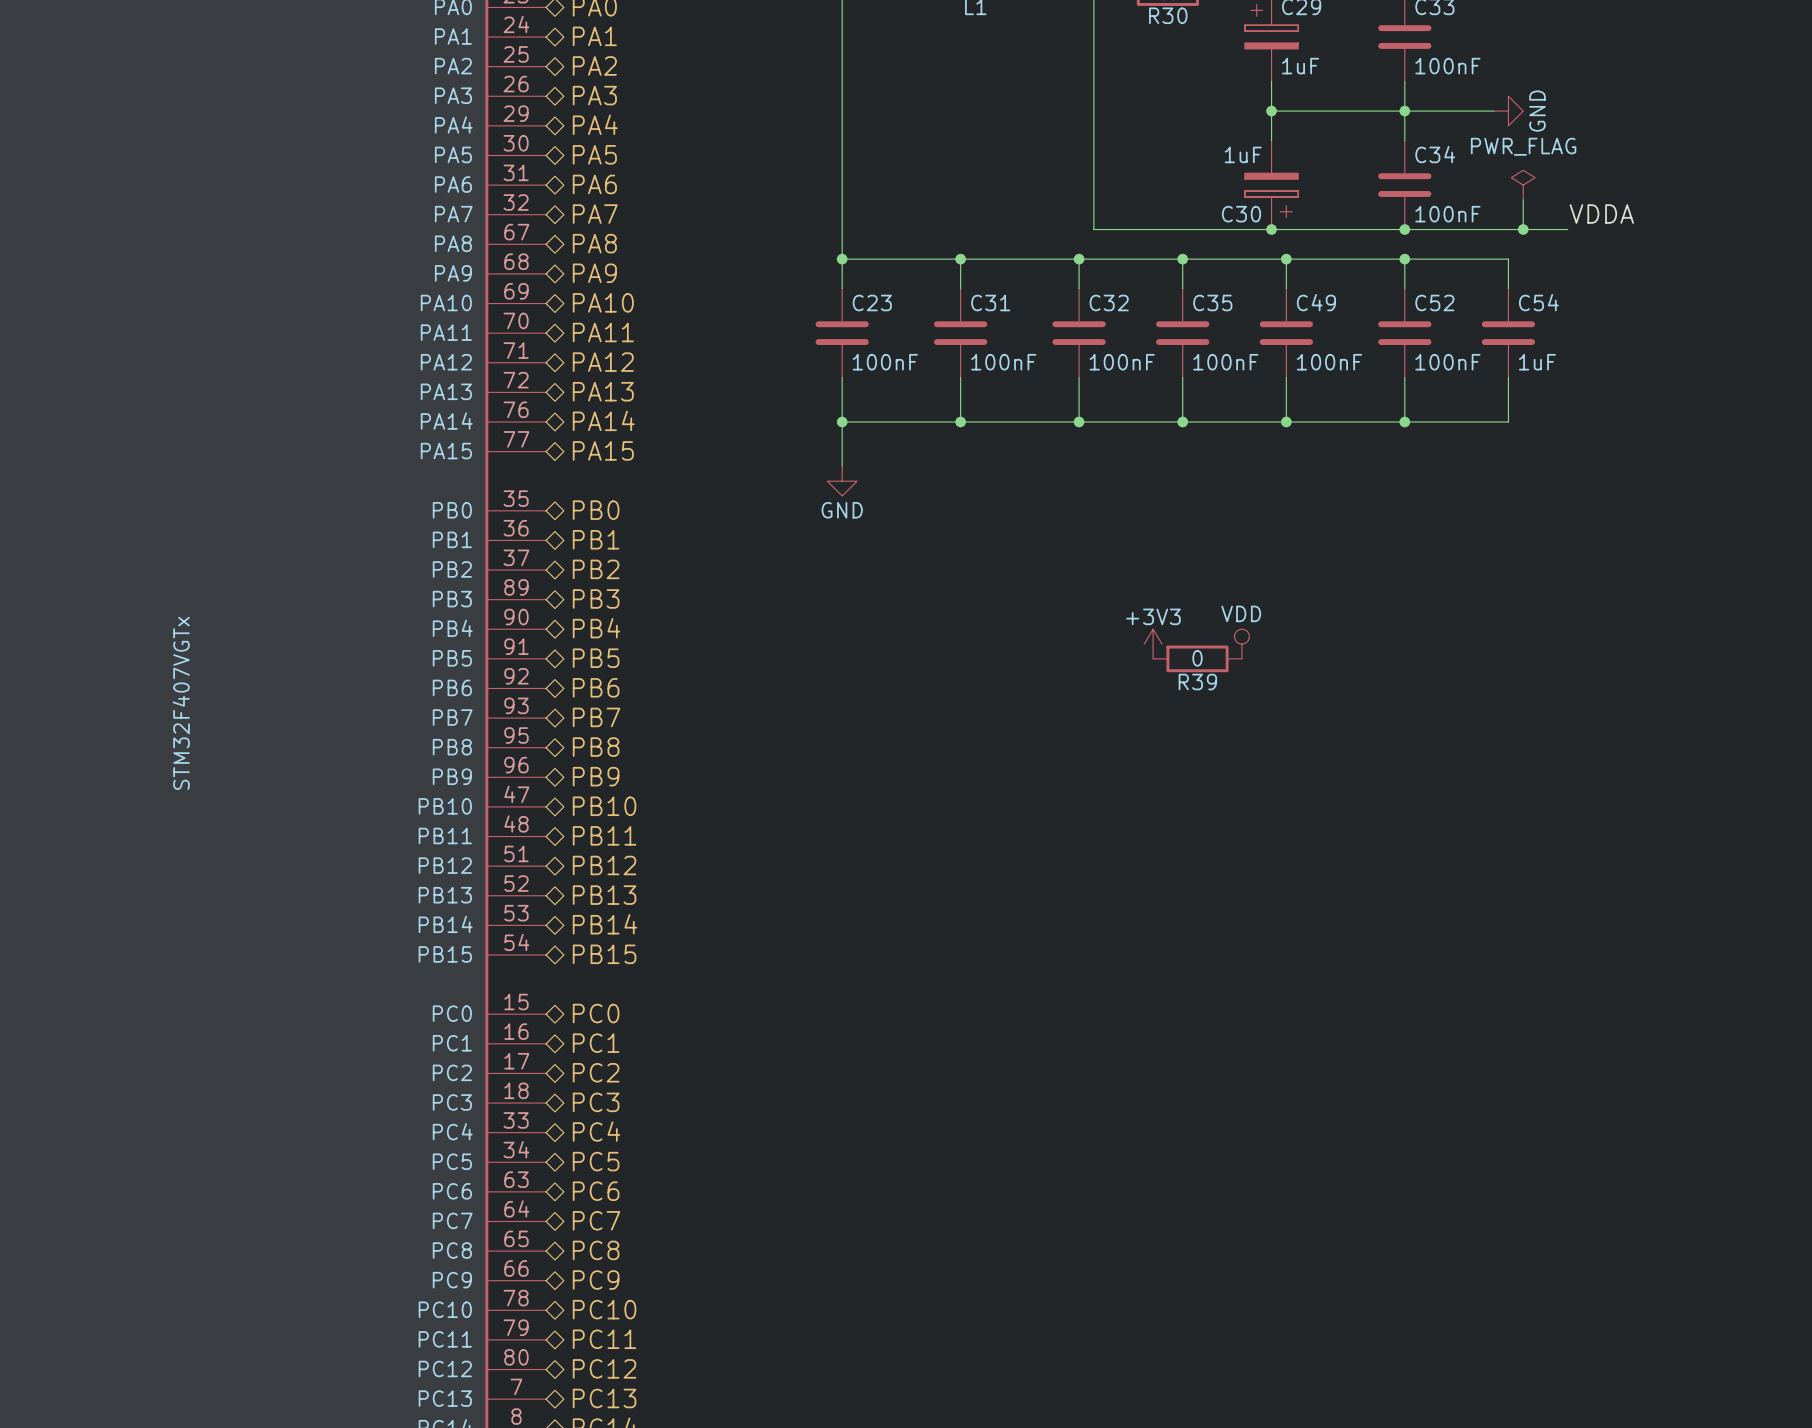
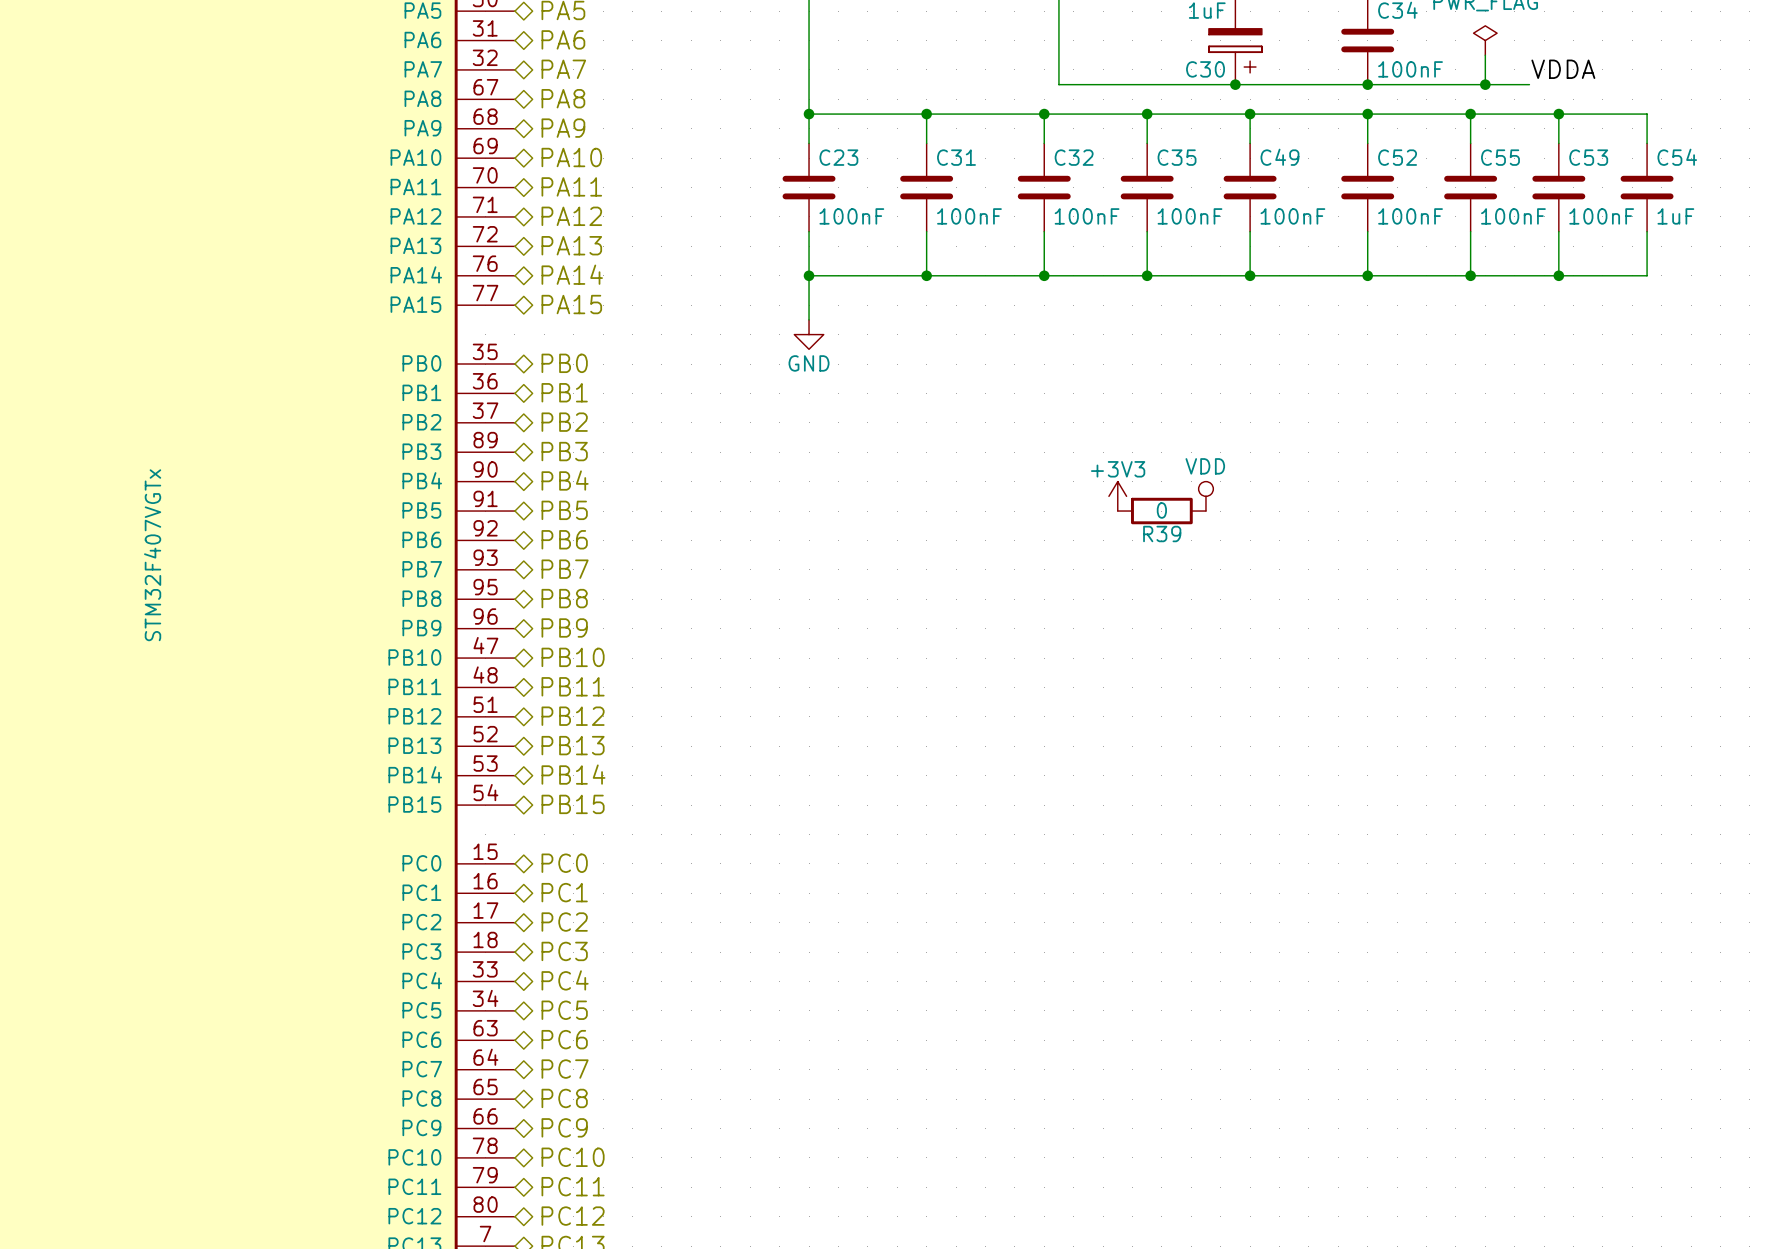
wire: none -> (1470, 114) (1647, 114) (1647, 143)
junction: none -> (1470, 114)
wire: none -> (1558, 114) (1558, 143)
junction: none -> (1558, 114)
C54 name: C54 (1538, 302) -> C55 (1500, 157)
C53: none -> 100nF (1558, 187)
C54: none -> 1uF (1647, 187)
C54 value: 1uF (1537, 362) -> 100nF (1513, 216)
wire: none -> (1558, 231) (1558, 275)
wire: none -> (1647, 231) (1647, 275) (1470, 275)
junction: none -> (1470, 275)
junction: none -> (1558, 275)

